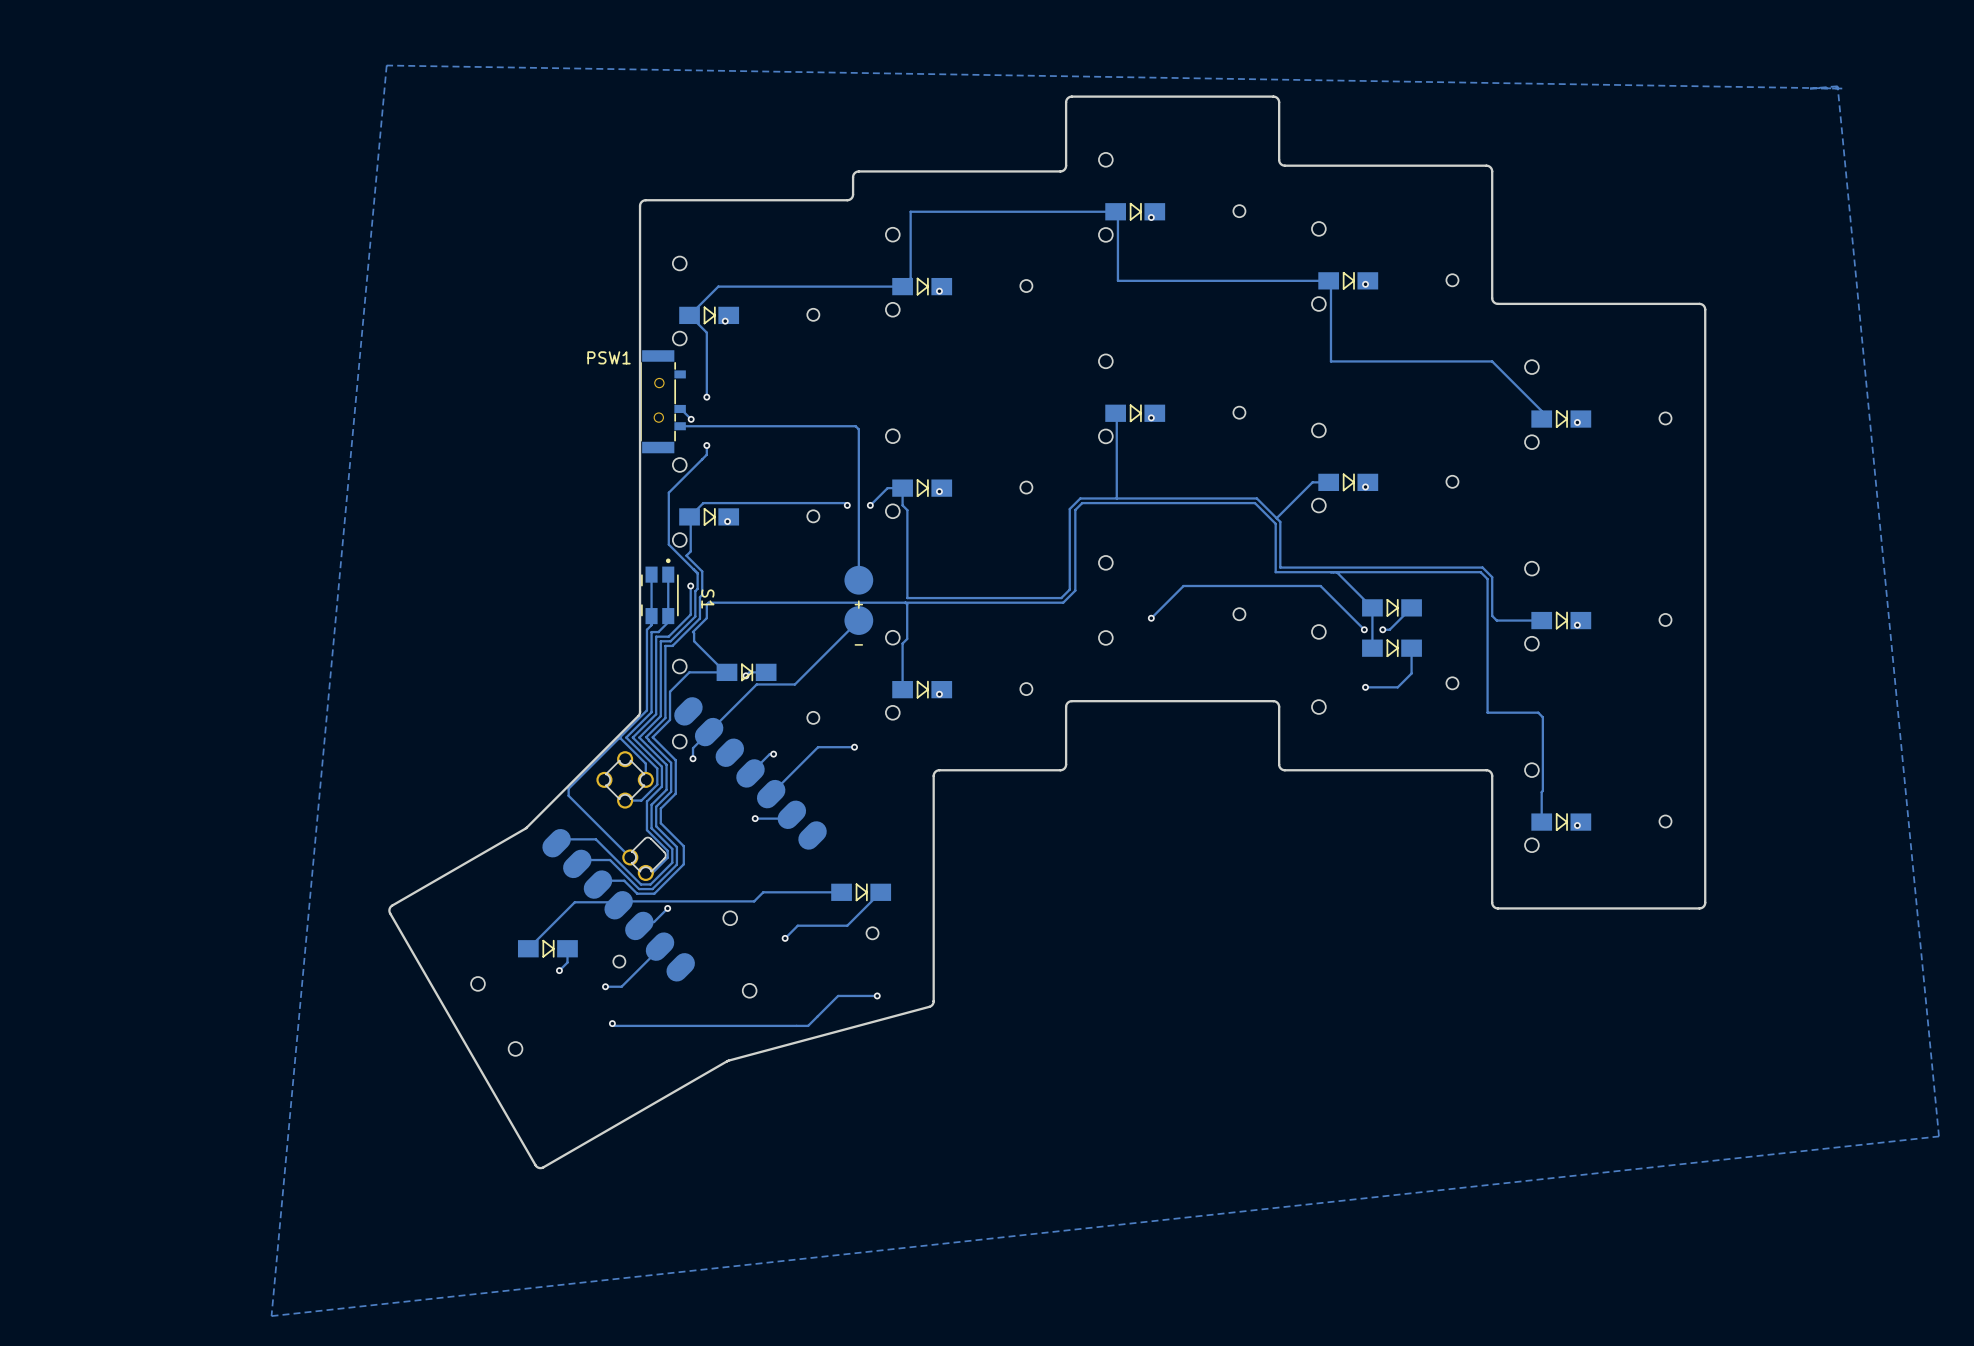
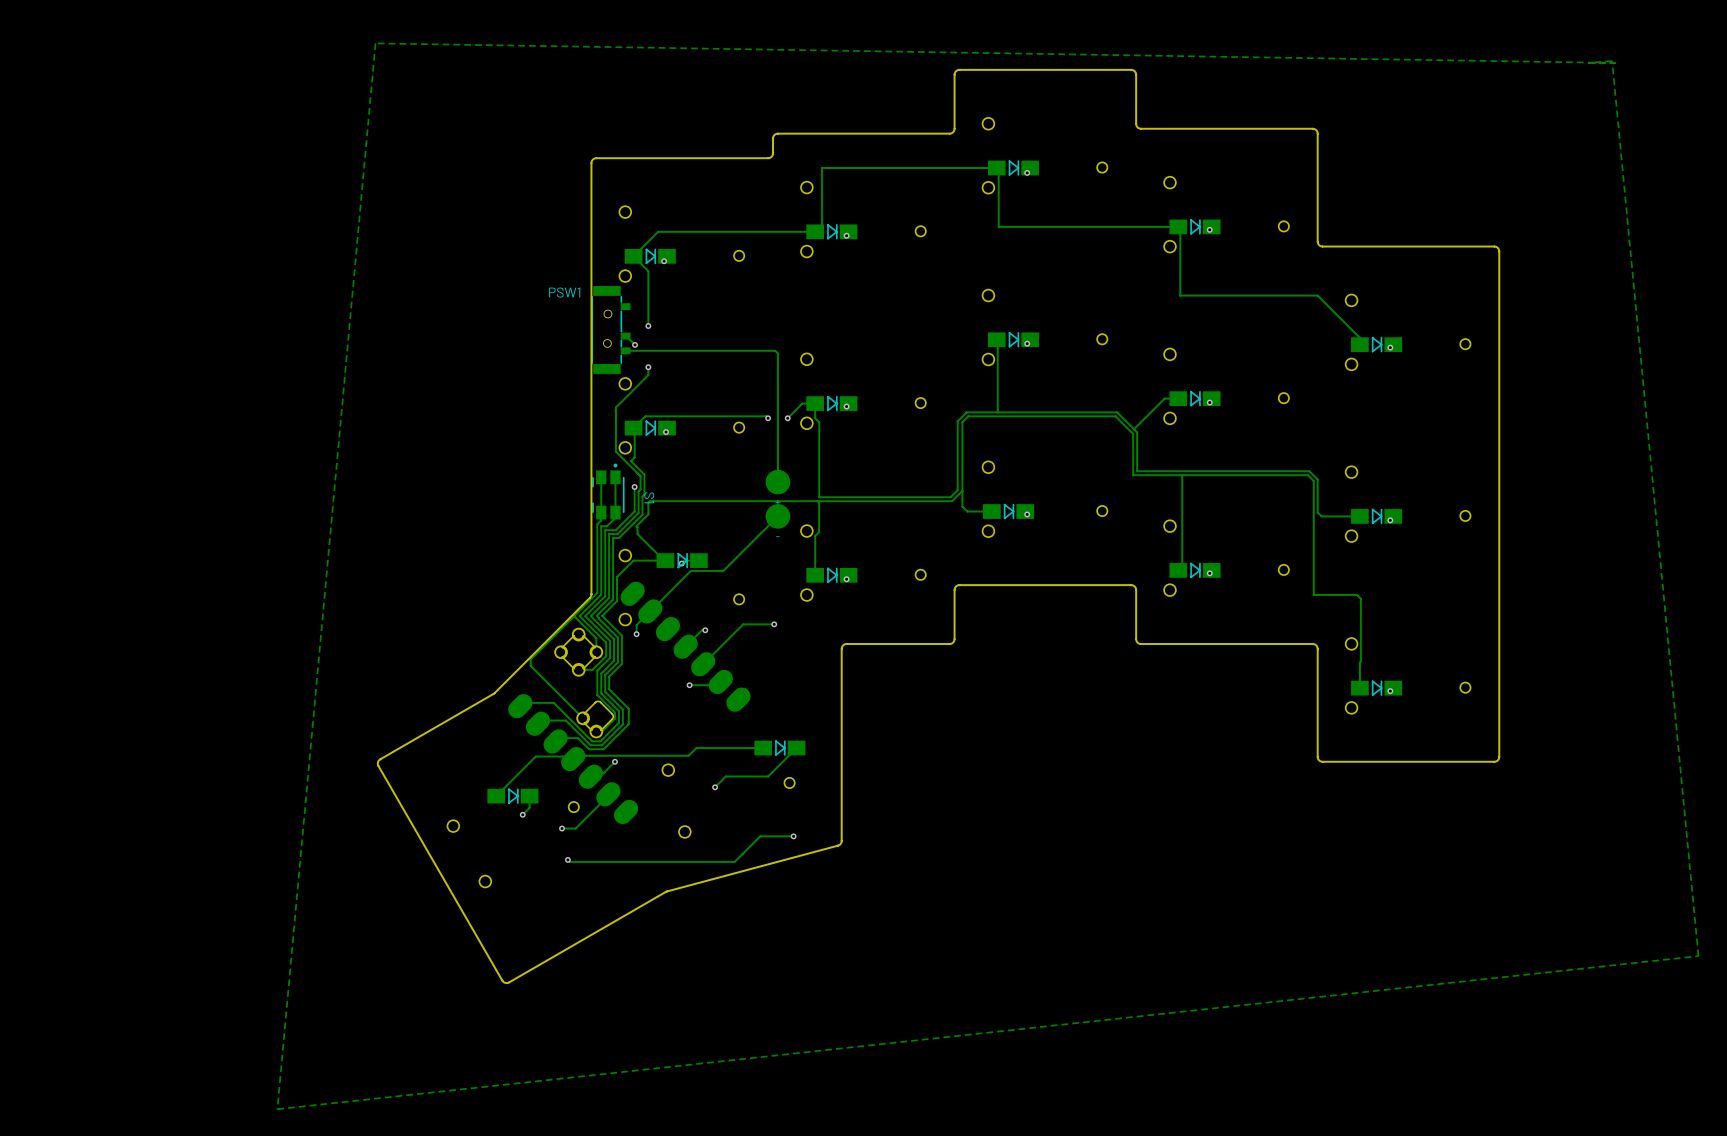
track: none -> (1182, 475) (1182, 566) (1178, 570)
track: (1336, 572) (1372, 607) (1372, 648) -> none
track: none -> (962, 490) (962, 506) (967, 511) (991, 511)
part: (1392, 607) -> none
track: (1411, 607) (1389, 629) (1382, 629) -> none
part: none -> (1008, 511)
track: (1151, 618) (1183, 586) (1320, 586) (1364, 629) -> none
via: (1364, 629) -> none
via: (1382, 629) -> none
part: (1392, 648) -> none
track: (1411, 648) (1411, 673) (1397, 687) (1365, 687) -> none
part: none -> (1195, 570)

